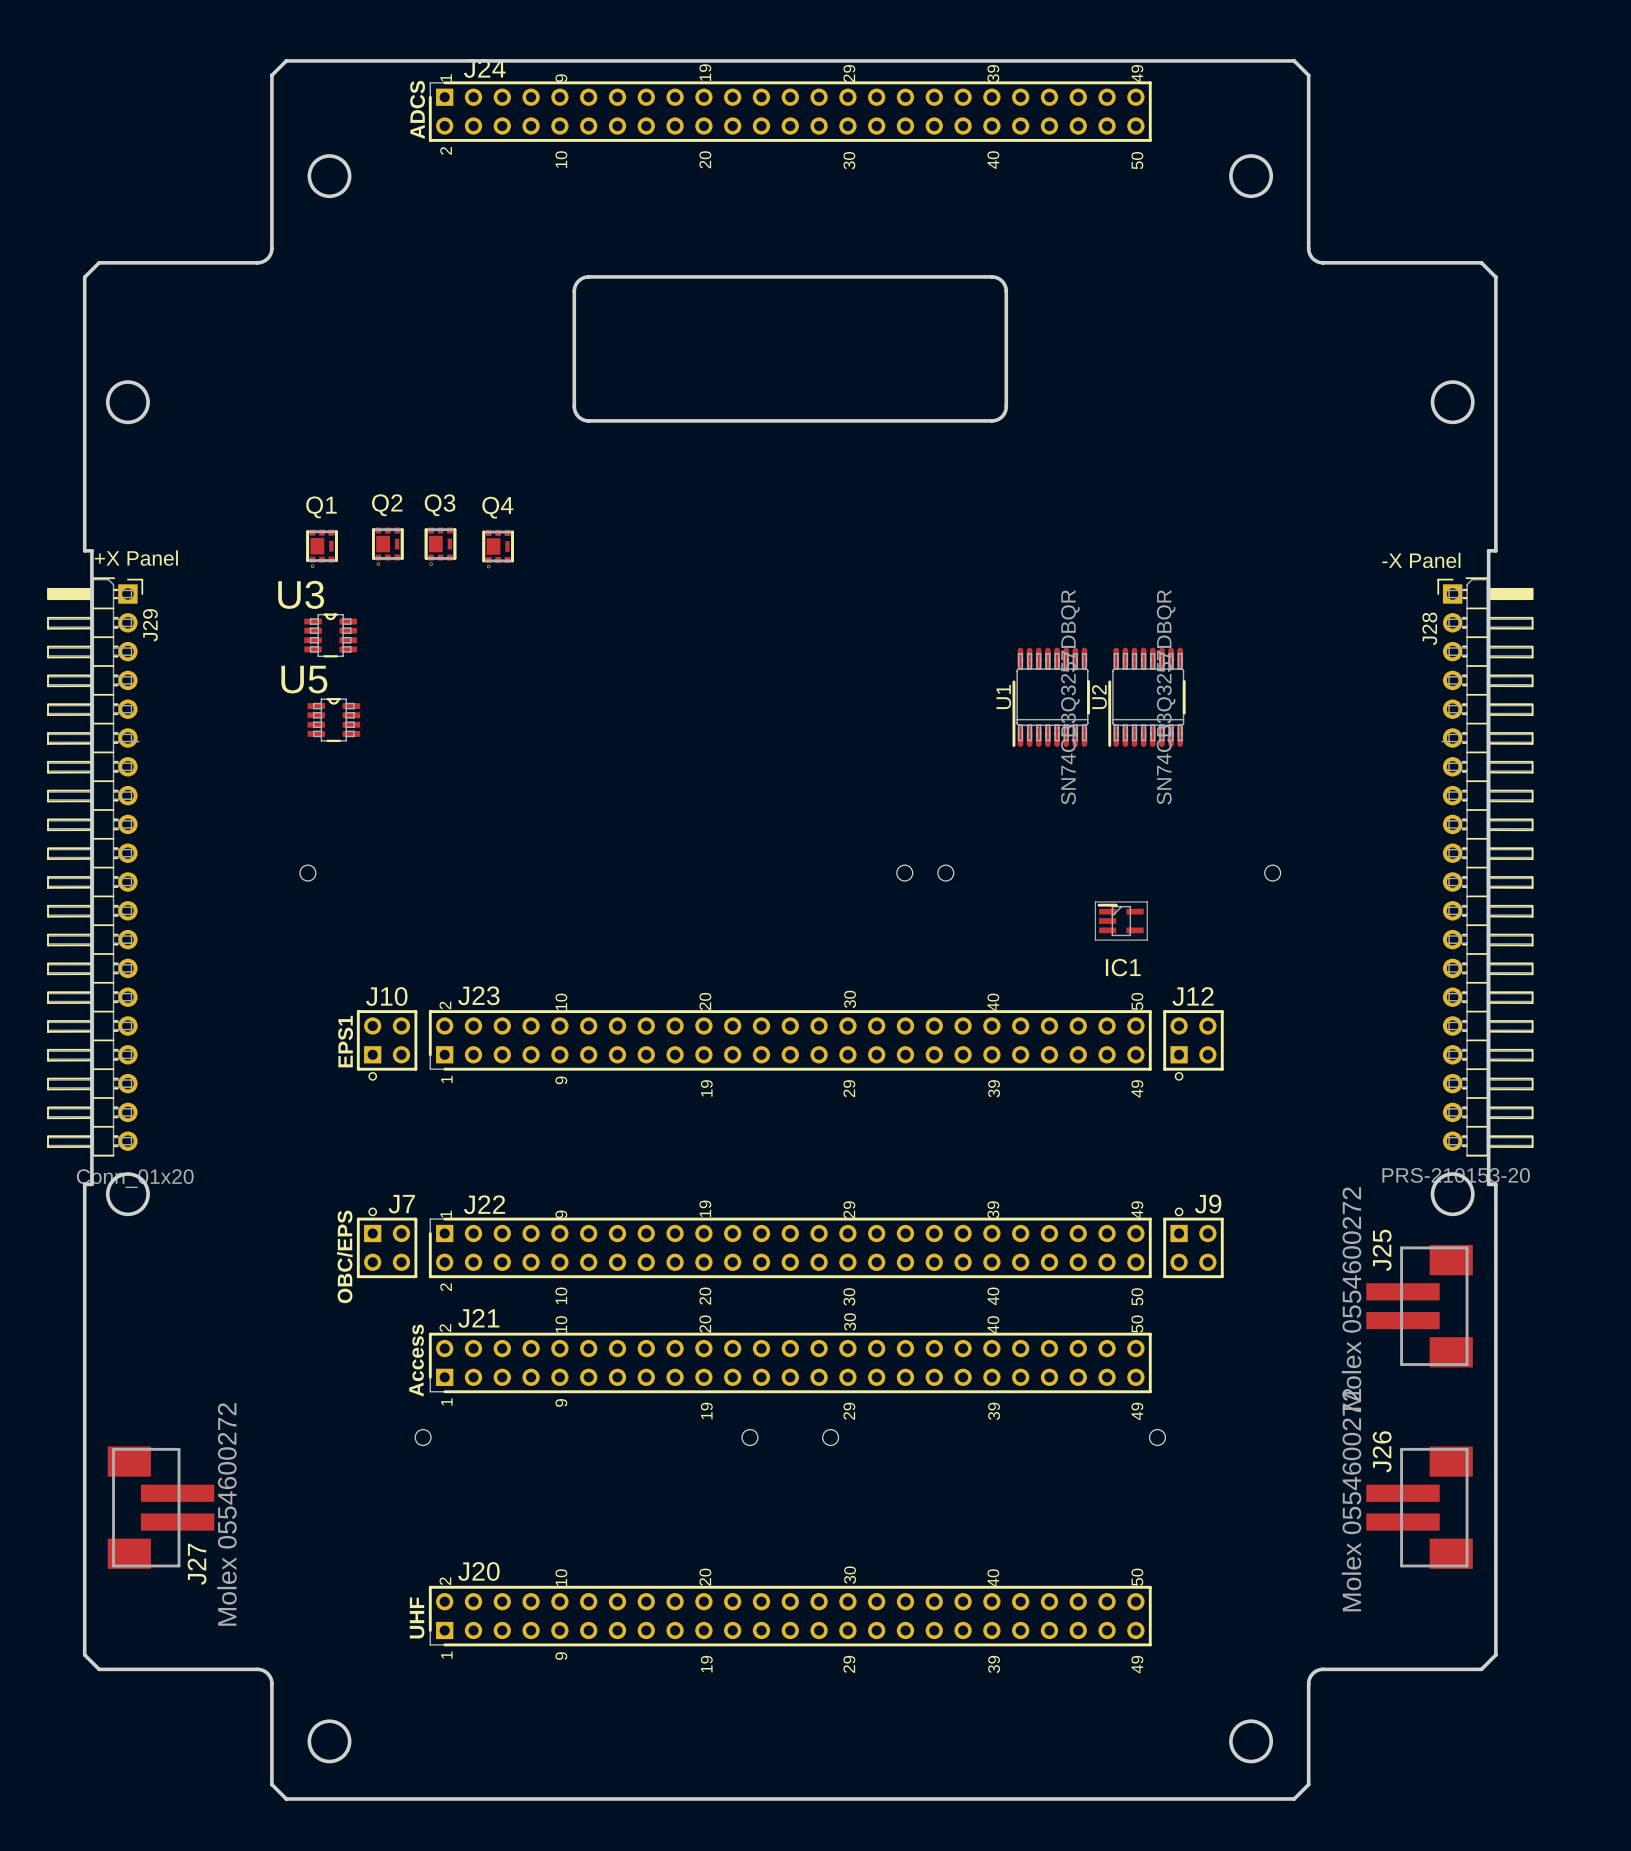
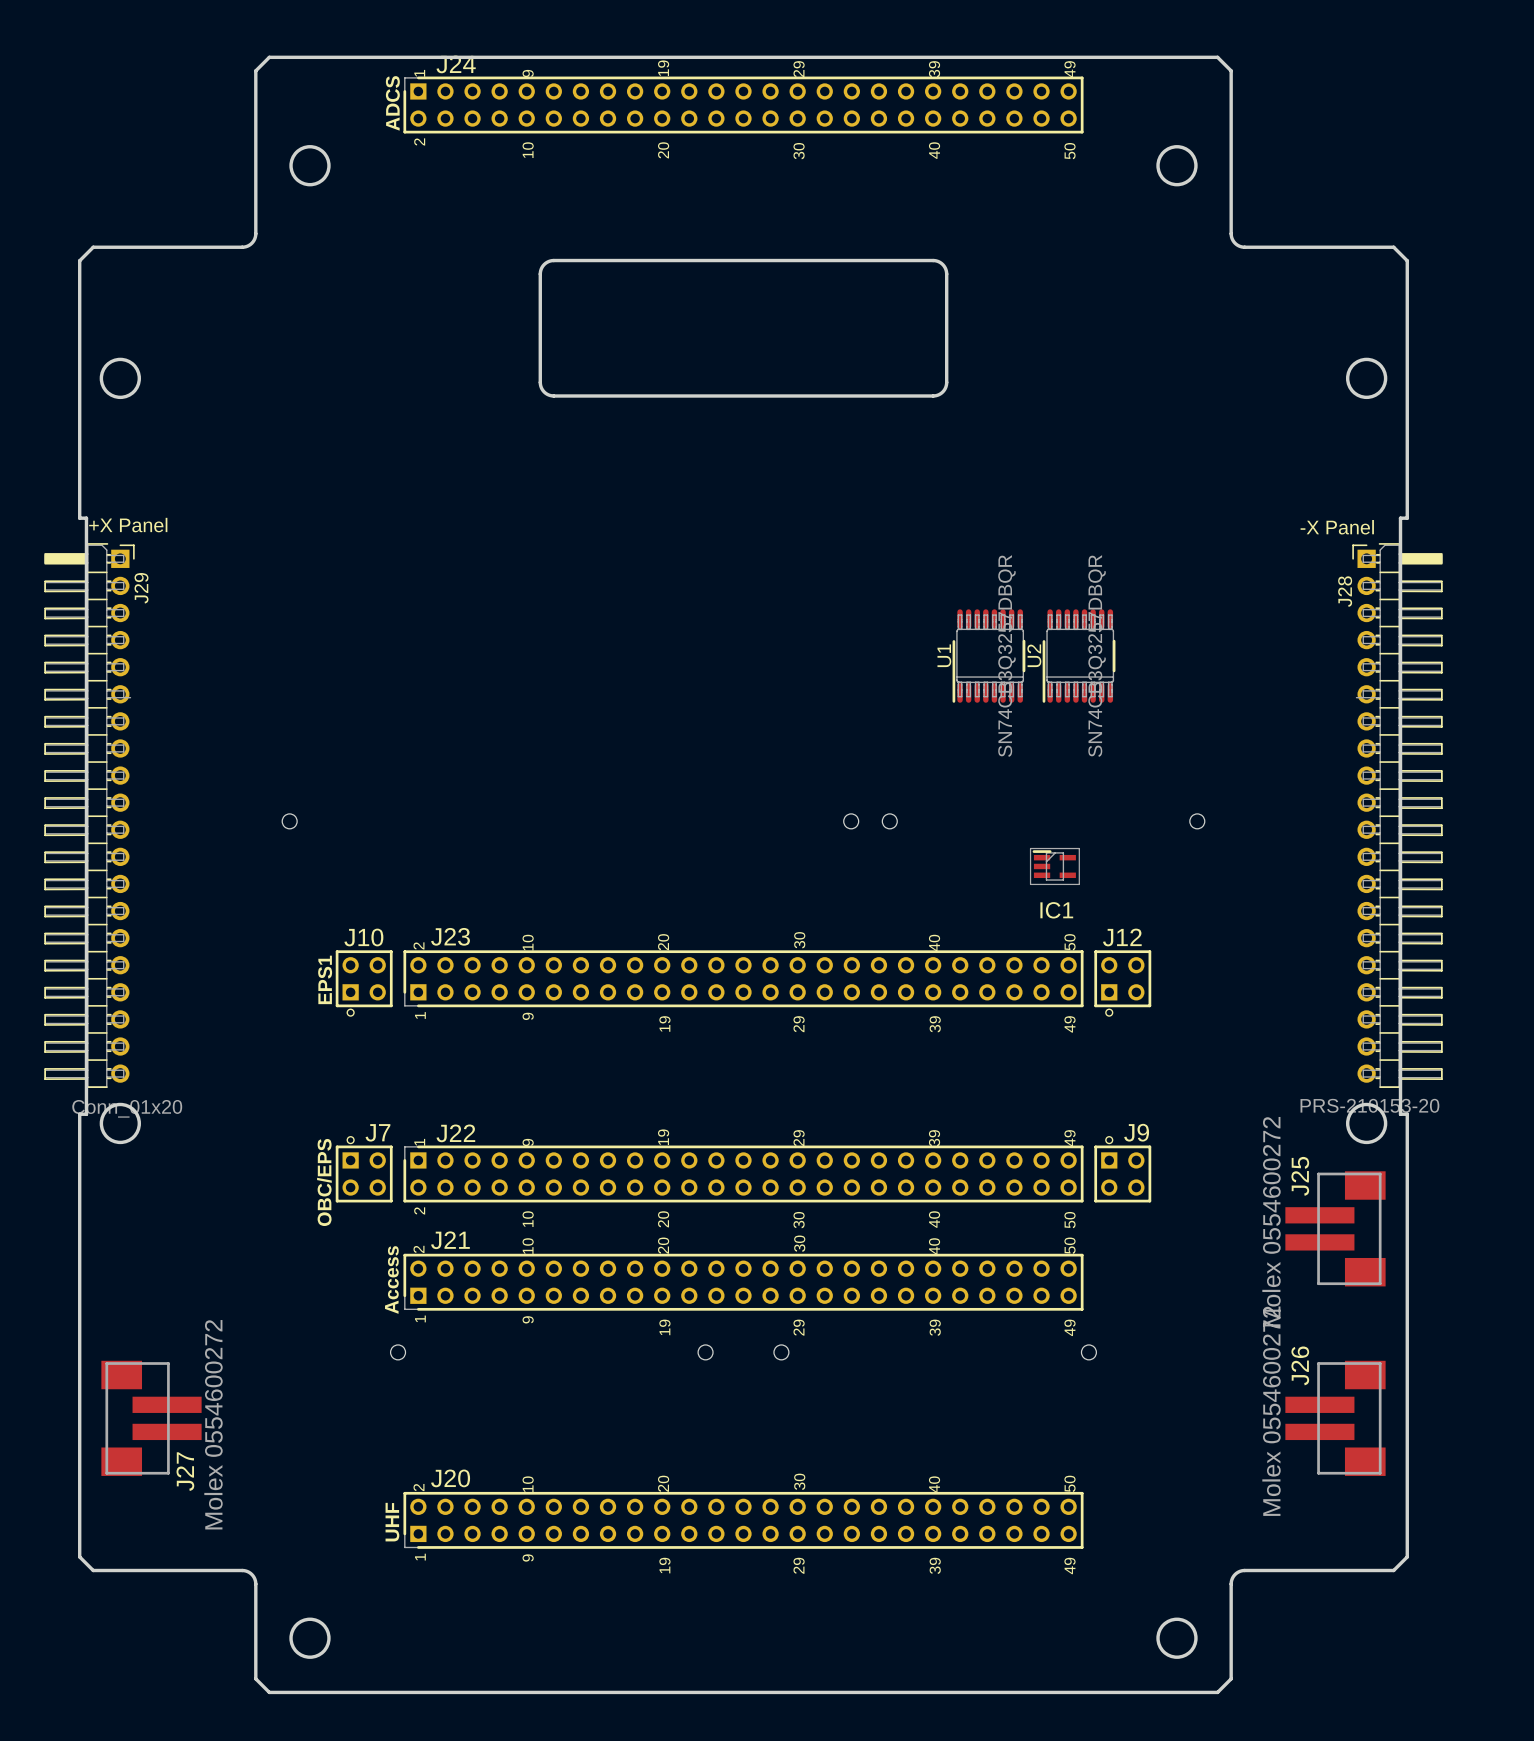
Q2: (387, 546) -> none
Q3: (440, 546) -> none
Q1: (322, 548) -> none
Q4: (498, 549) -> none
U3: (330, 635) -> none
U5: (333, 720) -> none

